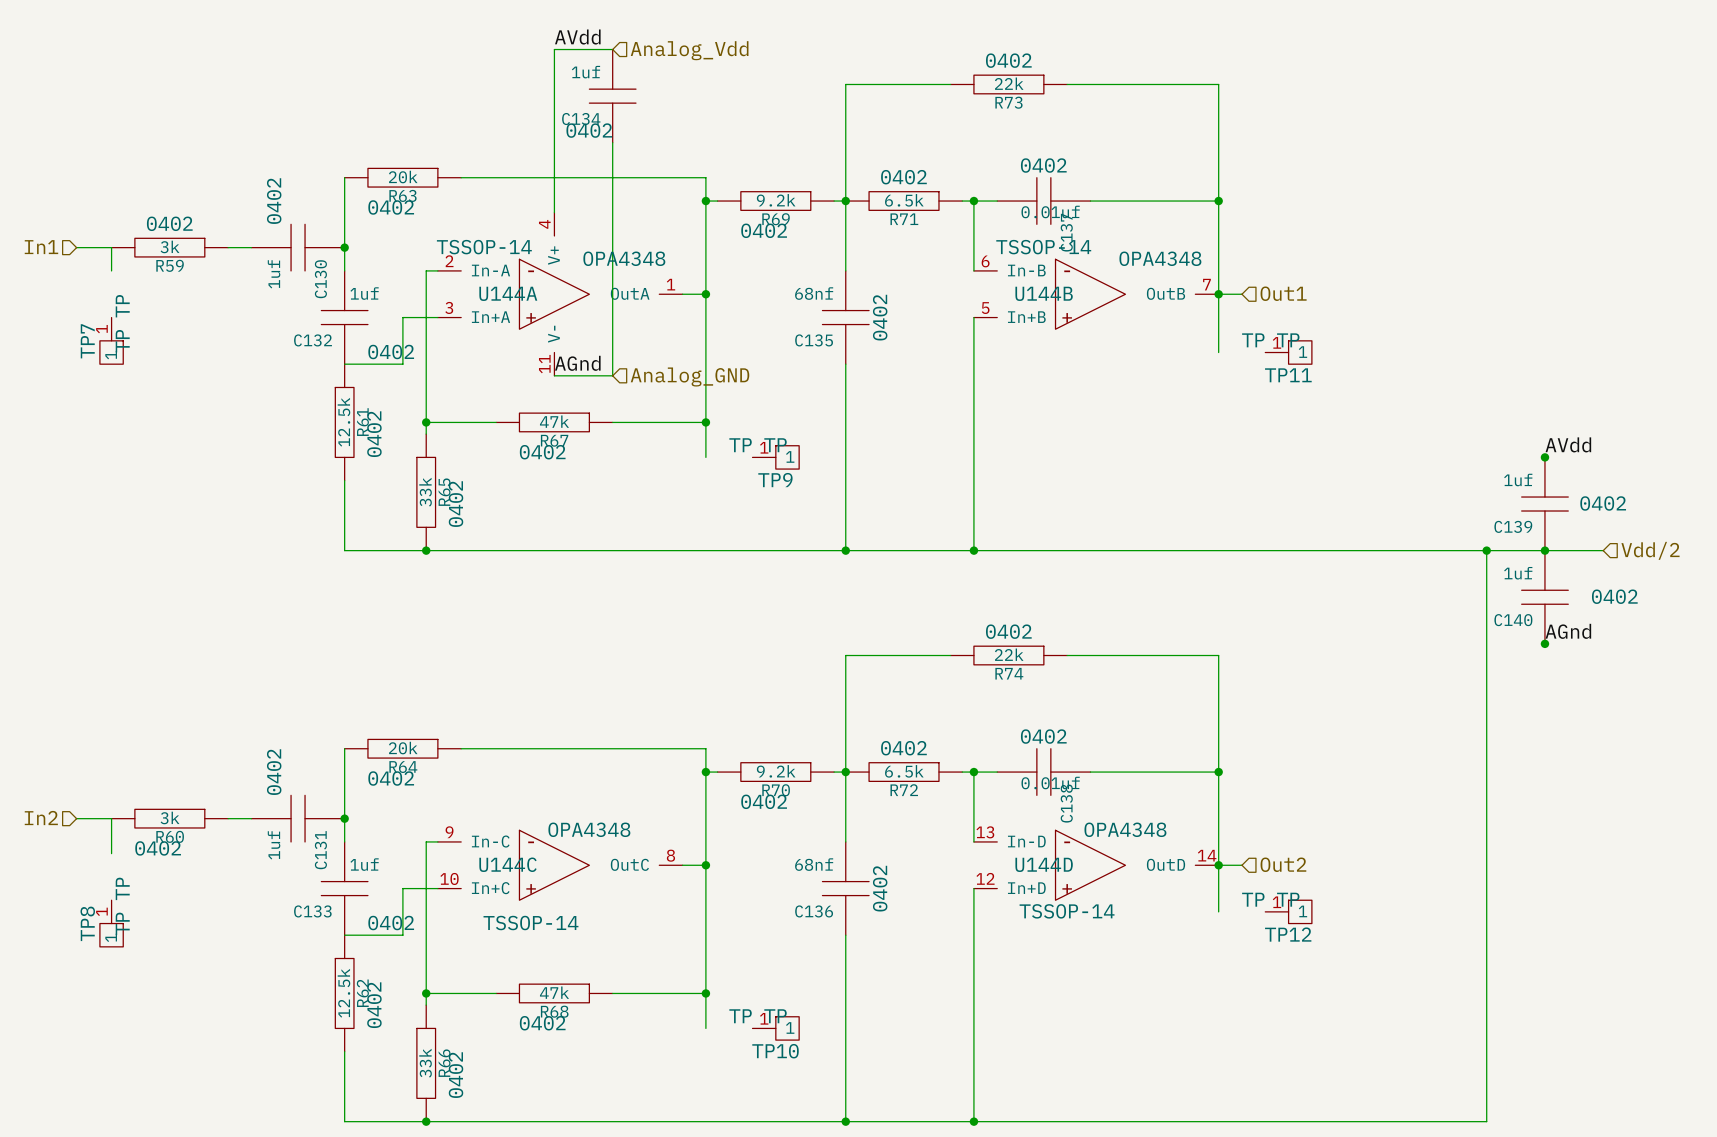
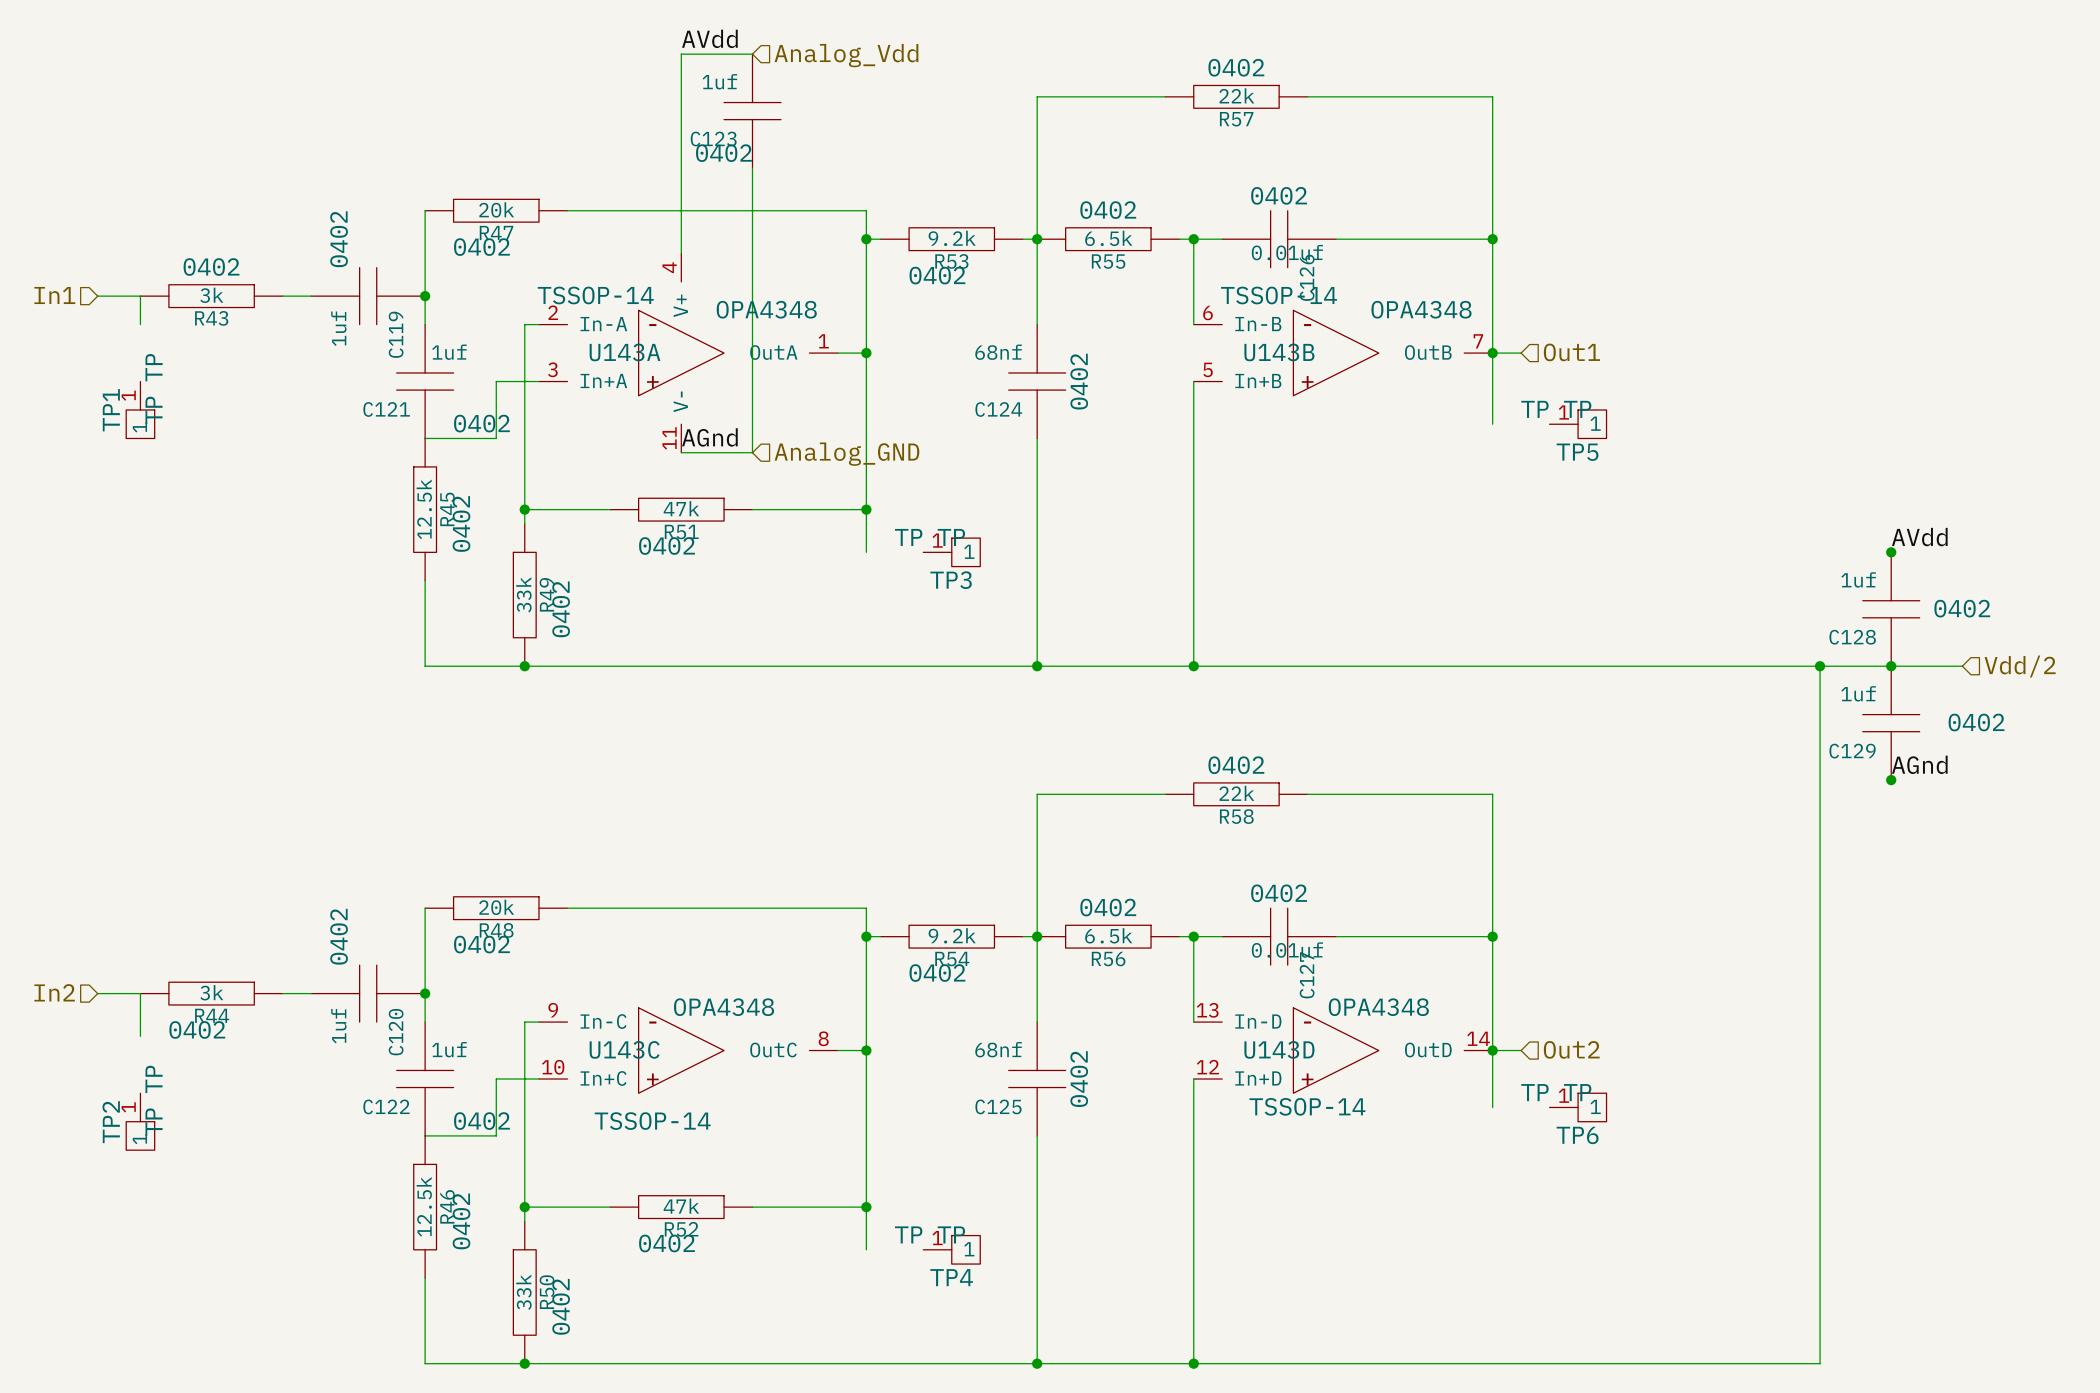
R73 name: R73 (1008, 102) -> R57 (1236, 119)
C134 name: C134 (581, 119) -> C123 (713, 139)
R63 name: R63 (402, 195) -> R47 (496, 232)
R69 name: R69 (776, 219) -> R53 (951, 261)
R71 name: R71 (904, 219) -> R55 (1108, 261)
C137 name: C137 (1066, 232) -> C126 (1307, 277)
R59 name: R59 (170, 265) -> R43 (211, 318)
C130 name: C130 (320, 279) -> C119 (396, 334)
U144A name: U144A (508, 293) -> U143A (625, 352)
U144B name: U144B (1044, 293) -> U143B (1279, 352)
C132 name: C132 (313, 340) -> C121 (386, 409)
C135 name: C135 (814, 340) -> C124 (998, 409)
TP7 name: TP7 (87, 341) -> TP1 (111, 410)
TP11 name: TP11 (1288, 375) -> TP5 (1577, 452)
R61 name: R61 (362, 422) -> R45 (447, 509)
R67 name: R67 (554, 440) -> R51 (681, 532)
TP9 name: TP9 (775, 480) -> TP3 (951, 580)
R65 name: R65 (444, 492) -> R49 (546, 594)
C139 name: C139 (1513, 526) -> C128 (1852, 637)
C140 name: C140 (1513, 620) -> C129 (1852, 751)
R74 name: R74 (1009, 673) -> R58 (1236, 816)
R64 name: R64 (403, 767) -> R48 (496, 930)
R70 name: R70 (776, 790) -> R54 (952, 959)
R72 name: R72 (904, 790) -> R56 (1108, 959)
C138 name: C138 (1066, 803) -> C127 (1307, 975)
R60 name: R60 (170, 836) -> R44 (212, 1015)
C131 name: C131 (320, 850) -> C120 (396, 1032)
U144C name: U144C (507, 864) -> U143C (624, 1049)
U144D name: U144D (1044, 864) -> U143D (1279, 1049)
C133 name: C133 (312, 911) -> C122 (386, 1106)
C136 name: C136 (814, 911) -> C125 (998, 1106)
TP8 name: TP8 (87, 923) -> TP2 (111, 1122)
TP12 name: TP12 (1288, 934) -> TP6 (1577, 1135)
R62 name: R62 (362, 993) -> R46 (447, 1206)
R68 name: R68 (554, 1011) -> R52 (681, 1229)
TP10 name: TP10 (775, 1051) -> TP4 (951, 1277)
R66 name: R66 (444, 1063) -> R50 (546, 1292)

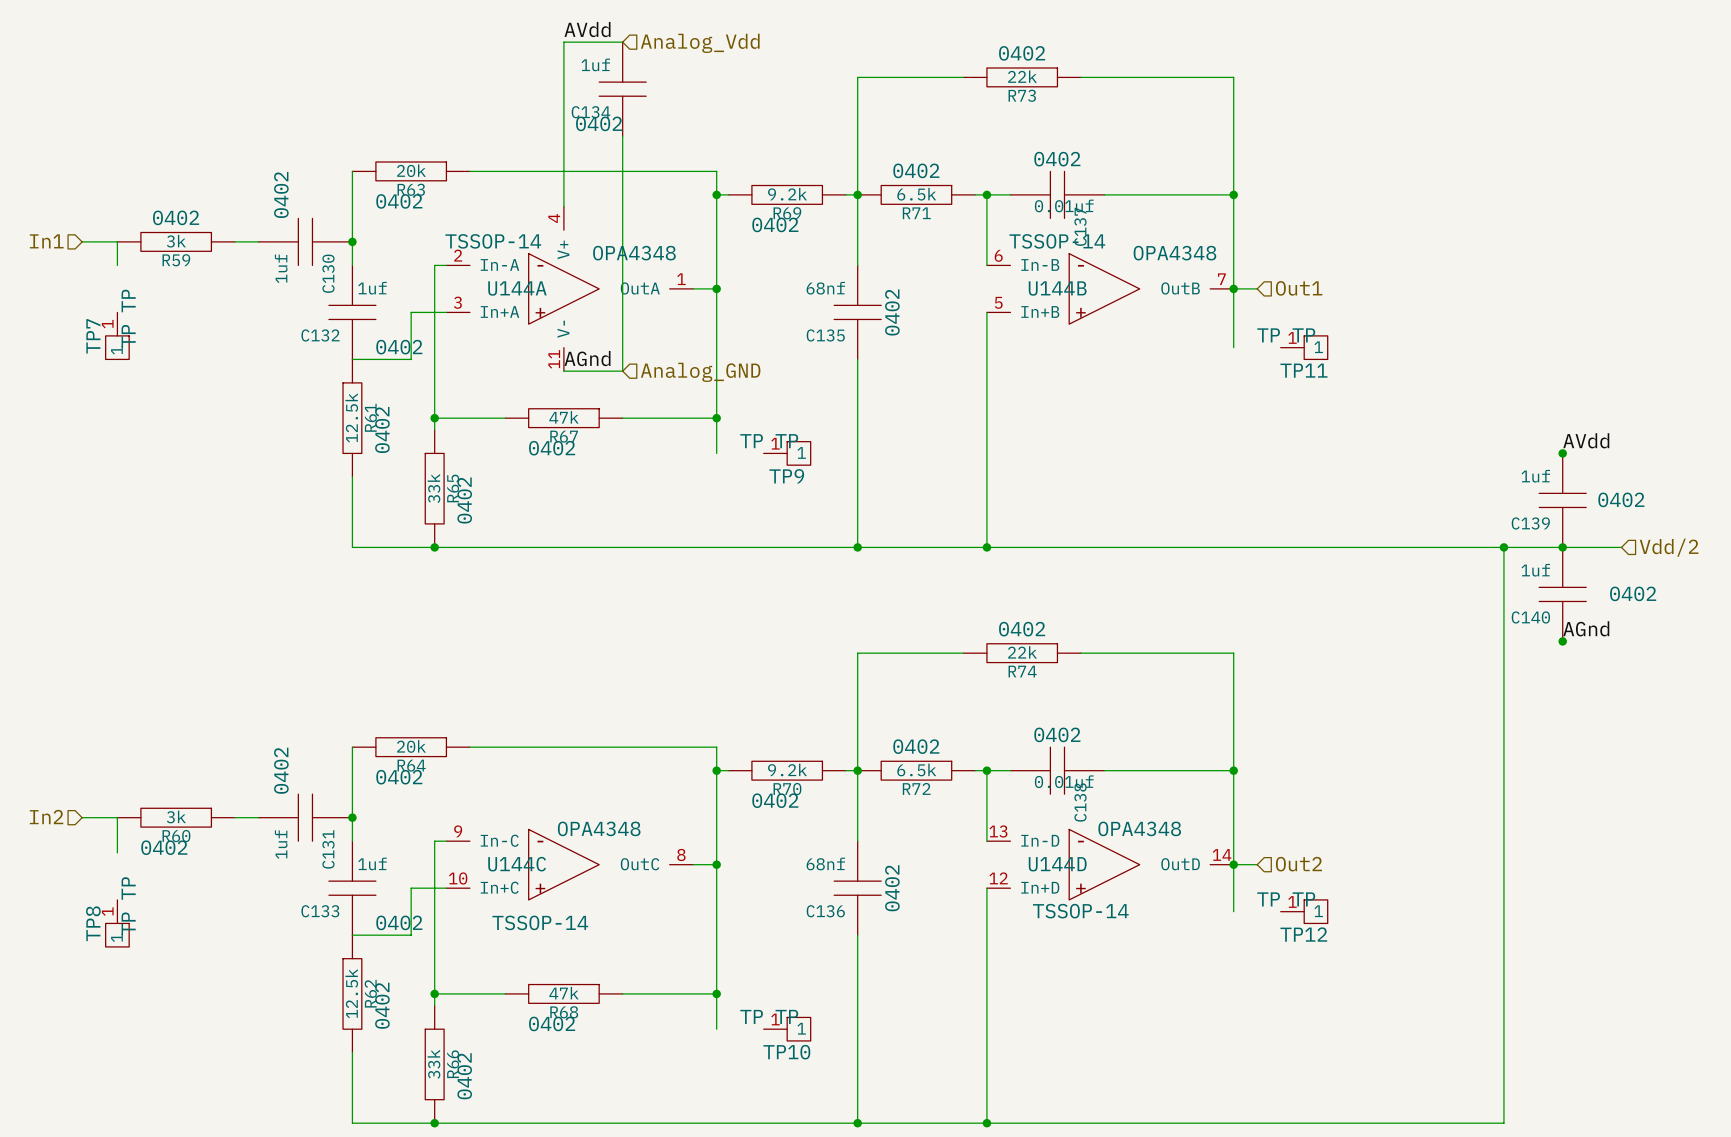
R57 name: R57 (1236, 119) -> R73 (1022, 95)
C123 name: C123 (713, 139) -> C134 (590, 112)
R47 name: R47 (496, 232) -> R63 (411, 189)
R53 name: R53 (951, 261) -> R69 (787, 213)
R55 name: R55 (1108, 261) -> R71 (916, 213)
C126 name: C126 (1307, 277) -> C137 (1080, 226)
R43 name: R43 (211, 318) -> R59 (176, 260)
C119 name: C119 (396, 334) -> C130 (328, 273)
U143A name: U143A (625, 352) -> U144A (517, 288)
U143B name: U143B (1279, 352) -> U144B (1057, 288)
C121 name: C121 (386, 409) -> C132 (320, 335)
C124 name: C124 (998, 409) -> C135 (825, 335)
TP1 name: TP1 (111, 410) -> TP7 (93, 336)
TP5 name: TP5 (1577, 452) -> TP11 (1303, 370)
R45 name: R45 (447, 509) -> R61 (370, 417)
R51 name: R51 (681, 532) -> R67 (564, 436)
TP3 name: TP3 (951, 580) -> TP9 (786, 476)
R49 name: R49 (546, 594) -> R65 (453, 488)
C128 name: C128 (1852, 637) -> C139 (1530, 523)
C129 name: C129 (1852, 751) -> C140 (1530, 617)
R58 name: R58 (1236, 816) -> R74 (1022, 671)
R48 name: R48 (496, 930) -> R64 (411, 765)
R54 name: R54 (952, 959) -> R70 (787, 789)
R56 name: R56 (1108, 959) -> R72 (916, 788)
C127 name: C127 (1307, 975) -> C138 (1080, 802)
R44 name: R44 (212, 1015) -> R60 (176, 836)
C120 name: C120 (396, 1032) -> C131 (328, 849)
U143C name: U143C (624, 1049) -> U144C (517, 864)
U143D name: U143D (1279, 1049) -> U144D (1057, 864)
C122 name: C122 (386, 1106) -> C133 (320, 911)
C125 name: C125 (998, 1106) -> C136 (825, 911)
TP2 name: TP2 (111, 1122) -> TP8 (93, 923)
TP6 name: TP6 (1577, 1135) -> TP12 (1303, 934)
R46 name: R46 (447, 1206) -> R62 (370, 993)
R52 name: R52 (681, 1229) -> R68 (564, 1012)
TP4 name: TP4 (951, 1277) -> TP10 (786, 1052)
R50 name: R50 (546, 1292) -> R66 (453, 1064)

